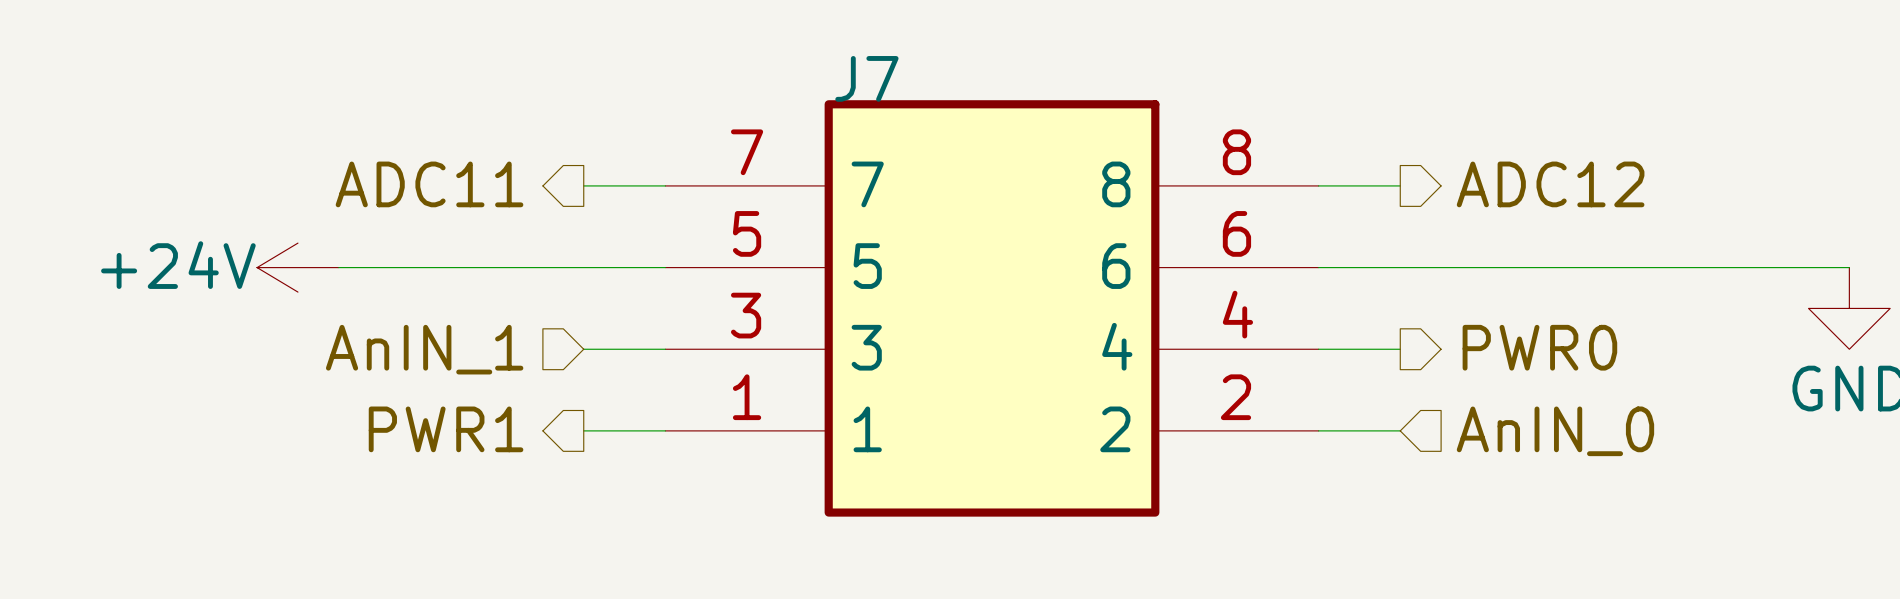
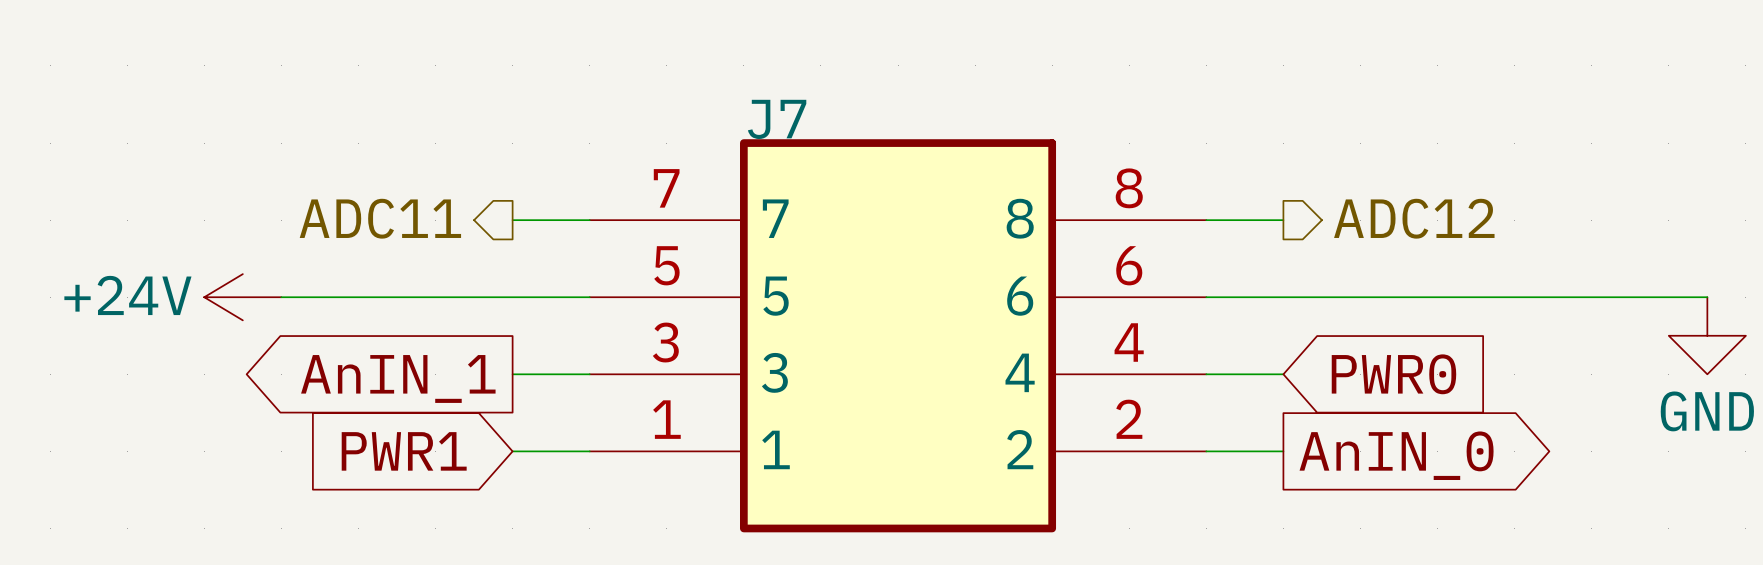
hierarchical label: PWR0 (1539, 347) -> none
hierarchical label: AnIN_1 (424, 349) -> none
global label: none -> PWR0 (1393, 374)
global label: none -> AnIN_1 (398, 378)
hierarchical label: PWR1 (446, 429) -> none
global label: none -> PWR1 (404, 451)
hierarchical label: AnIN_0 (1555, 431) -> none
global label: none -> AnIN_0 (1396, 455)

